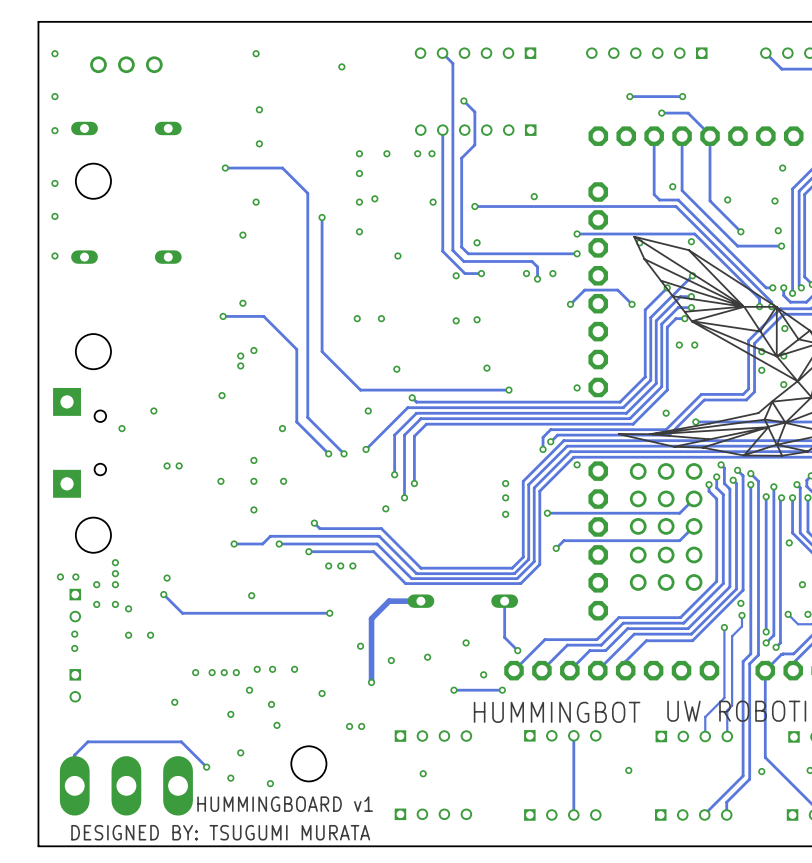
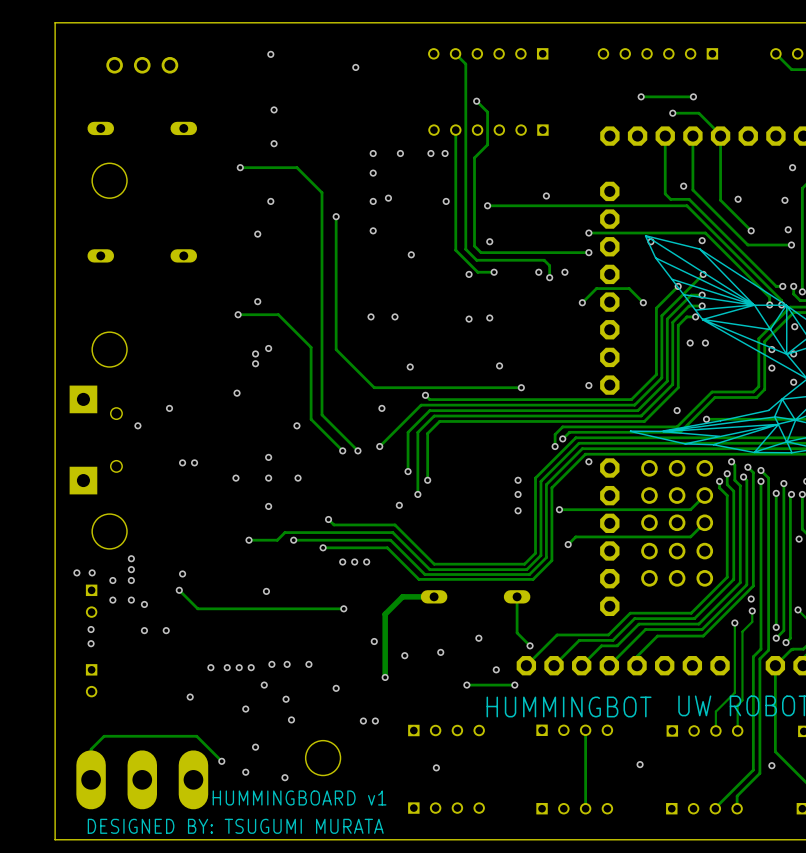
via: (54, 53) -> none
via: (54, 96) -> none
via: (54, 130) -> none
via: (54, 183) -> none
via: (54, 216) -> none
via: (54, 255) -> none

